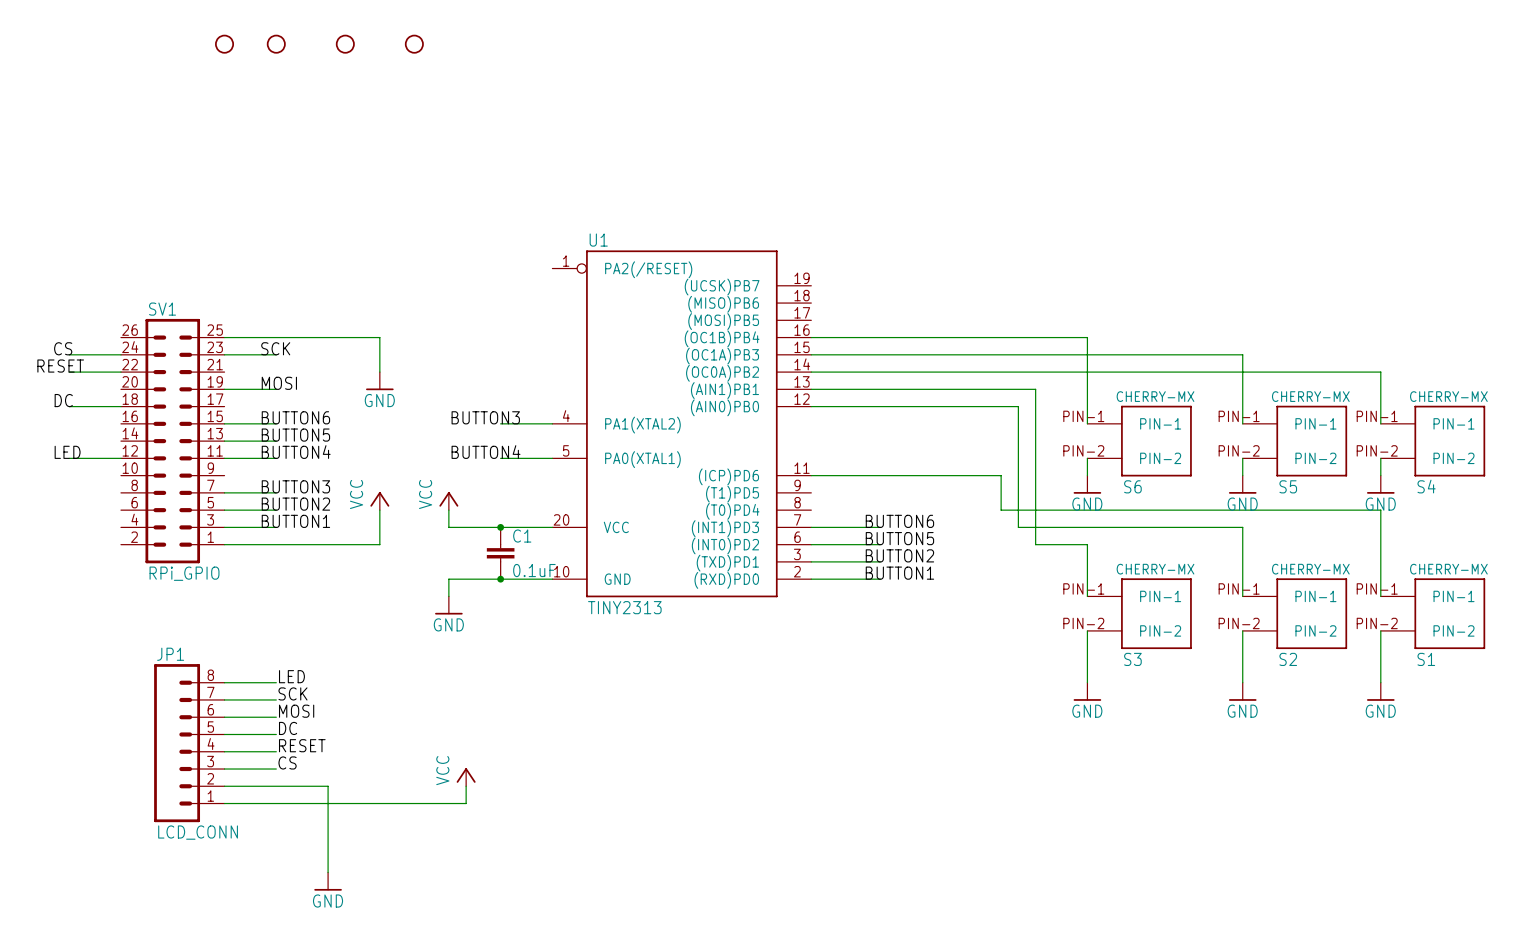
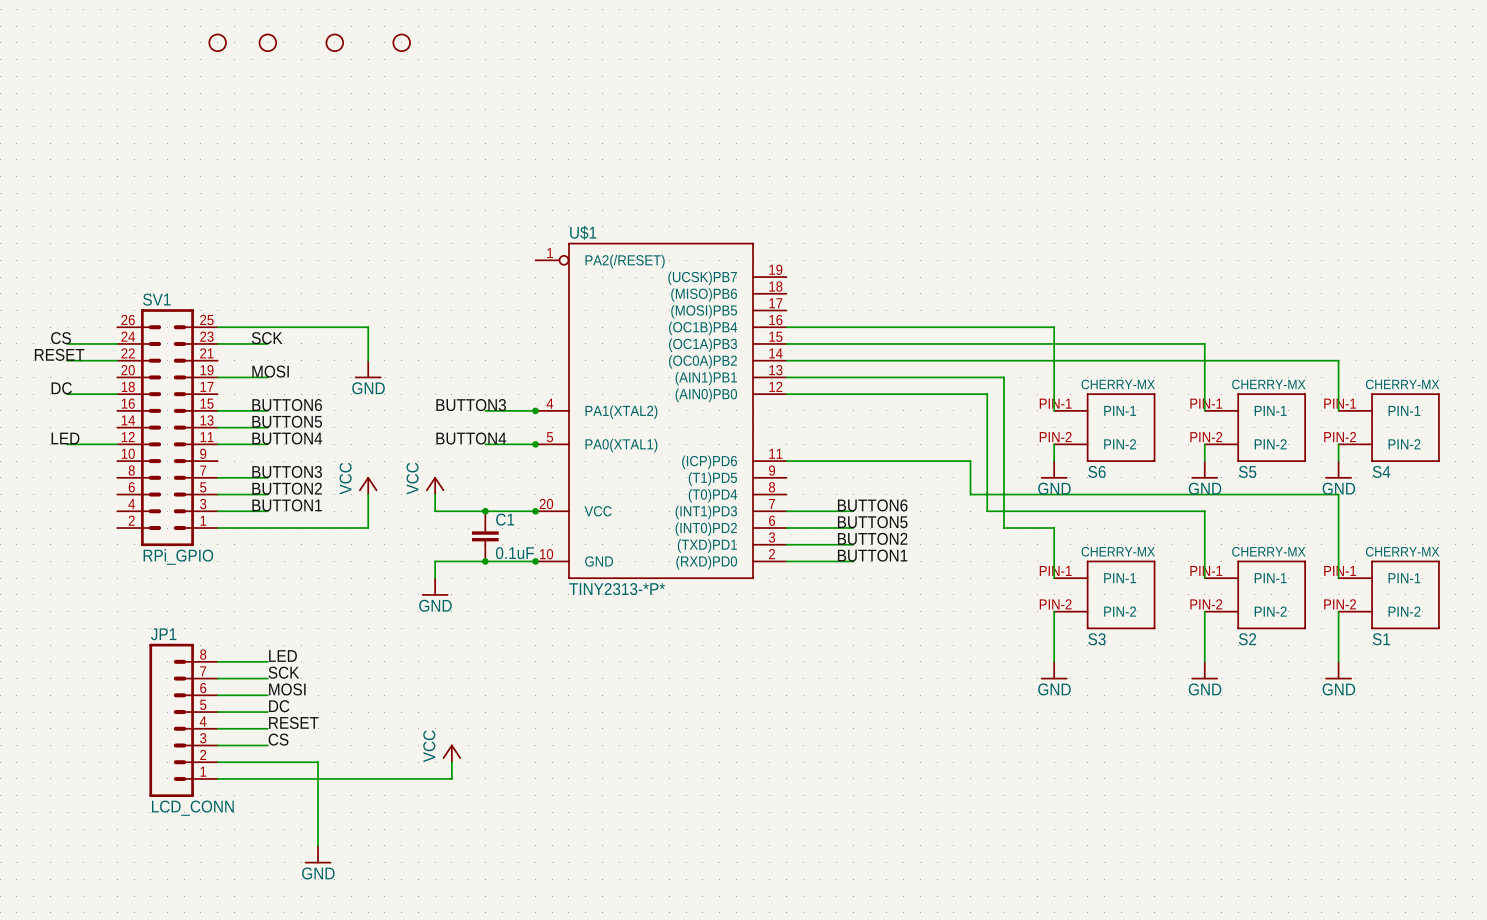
U1 name: U1 (598, 240) -> U$1 (583, 232)
junction: none -> (535, 410)
junction: none -> (535, 444)
junction: none -> (535, 511)
junction: none -> (535, 561)
U1 value: TINY2313 (624, 607) -> TINY2313-*P* (617, 589)

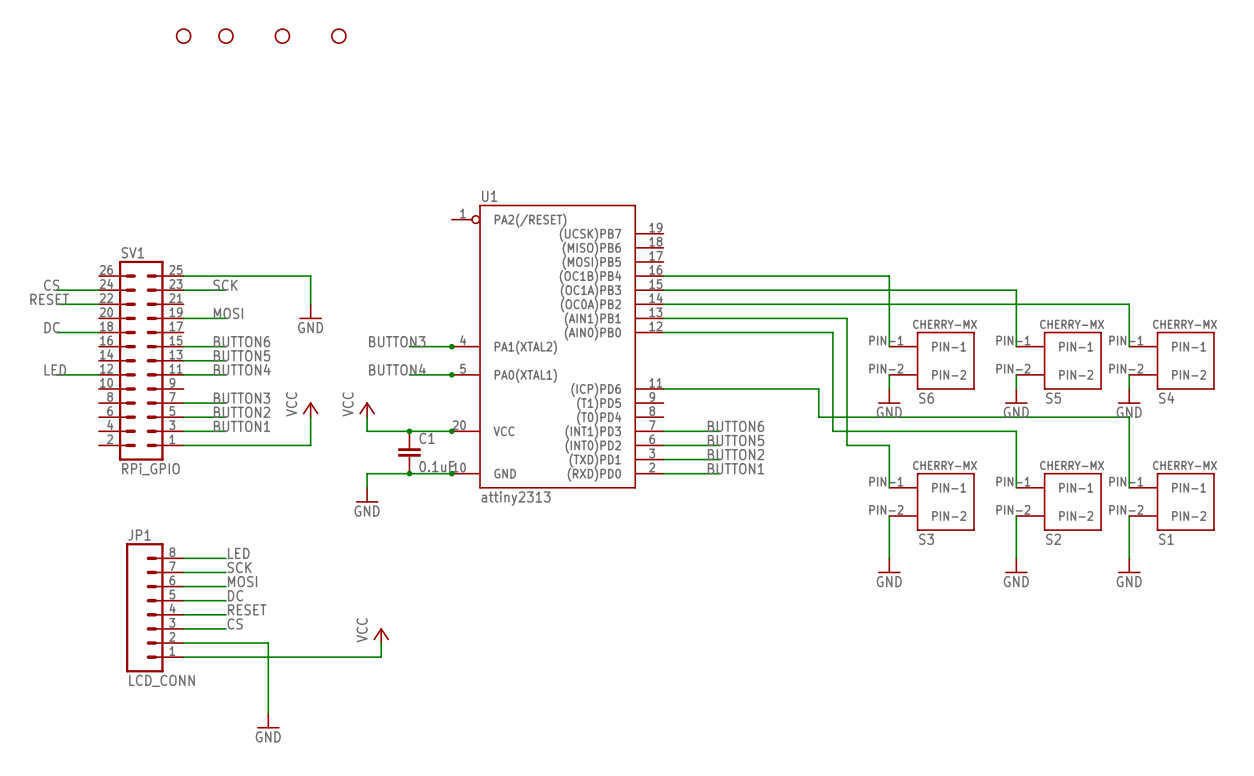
U$1 name: U$1 (583, 232) -> U1 (489, 196)
U$1 value: TINY2313-*P* (617, 589) -> attiny2313 (516, 498)

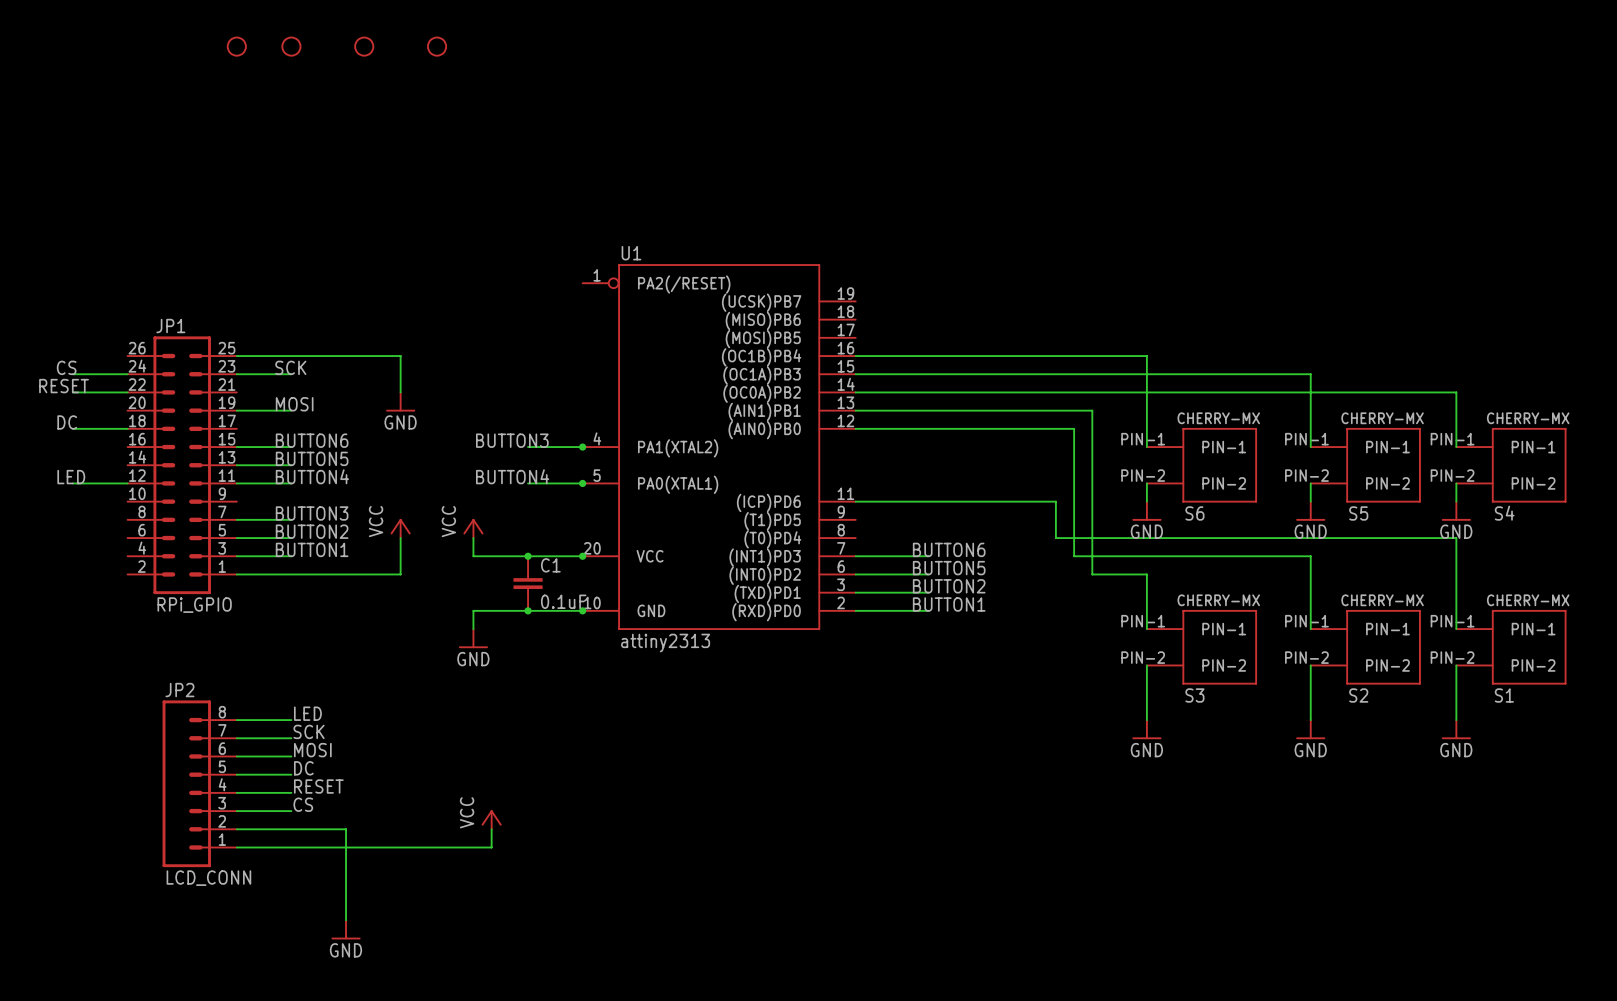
SV1 name: SV1 (132, 252) -> JP1 (170, 326)
JP1 name: JP1 (139, 535) -> JP2 (179, 690)

